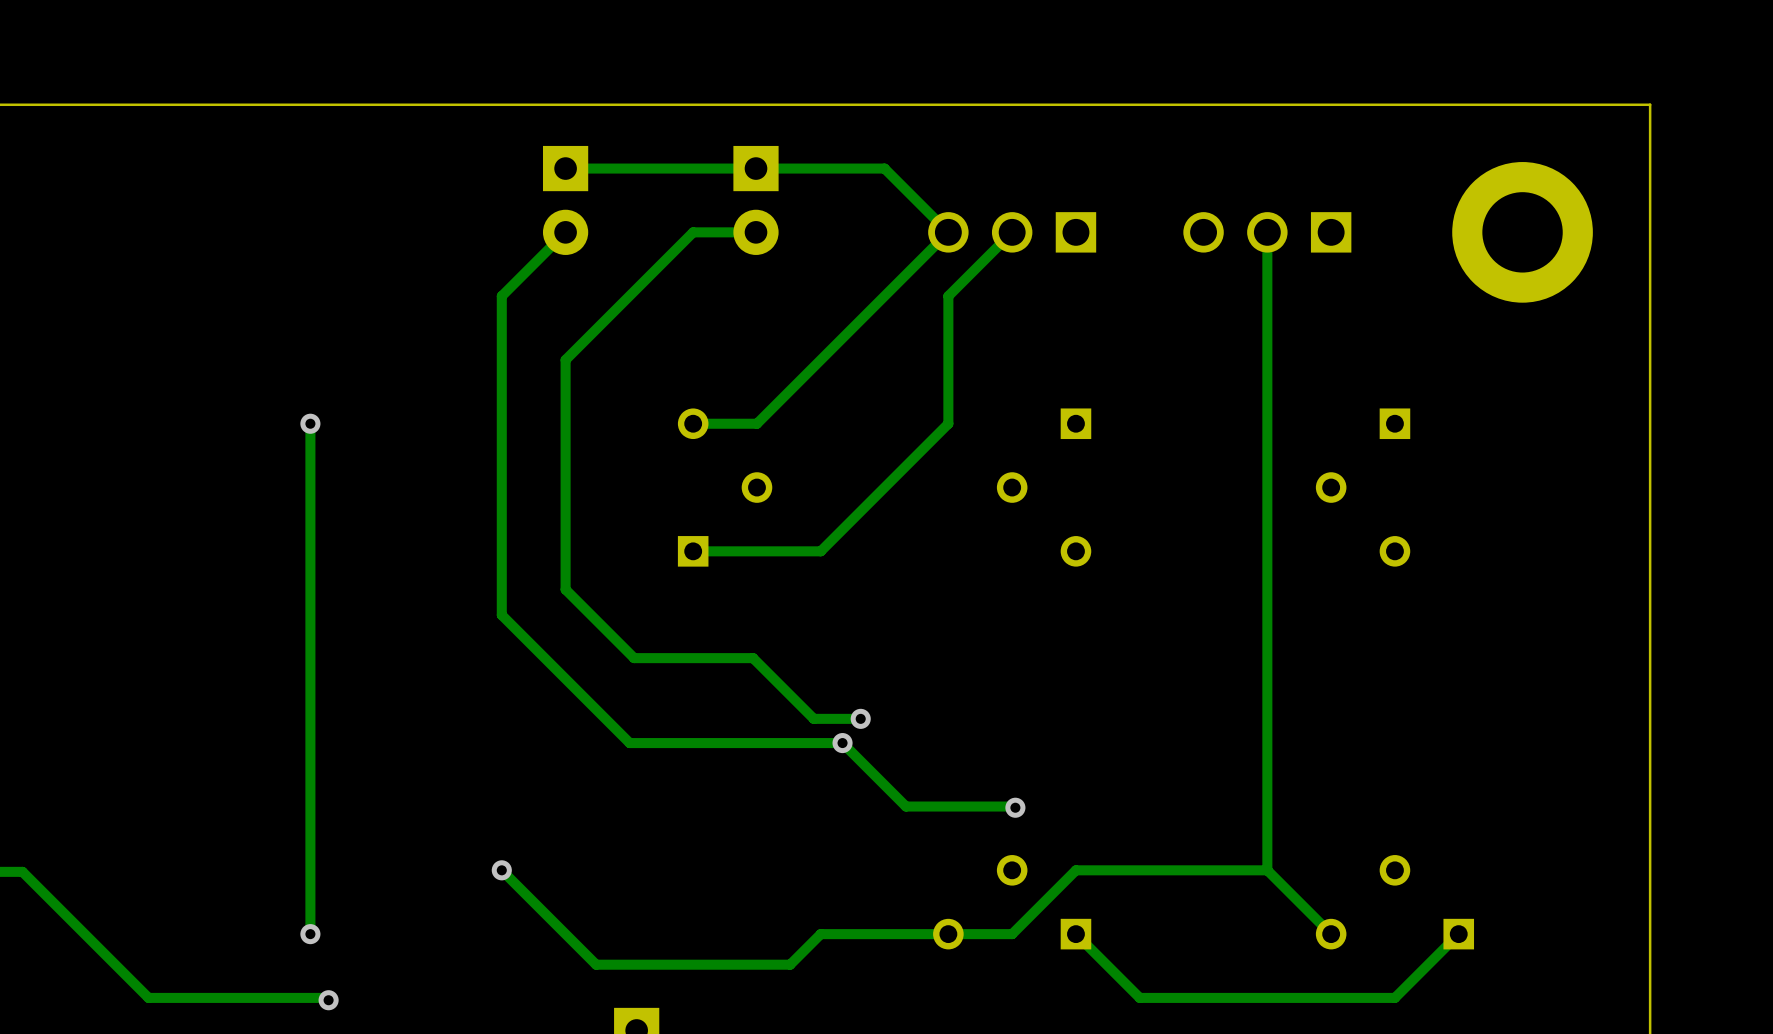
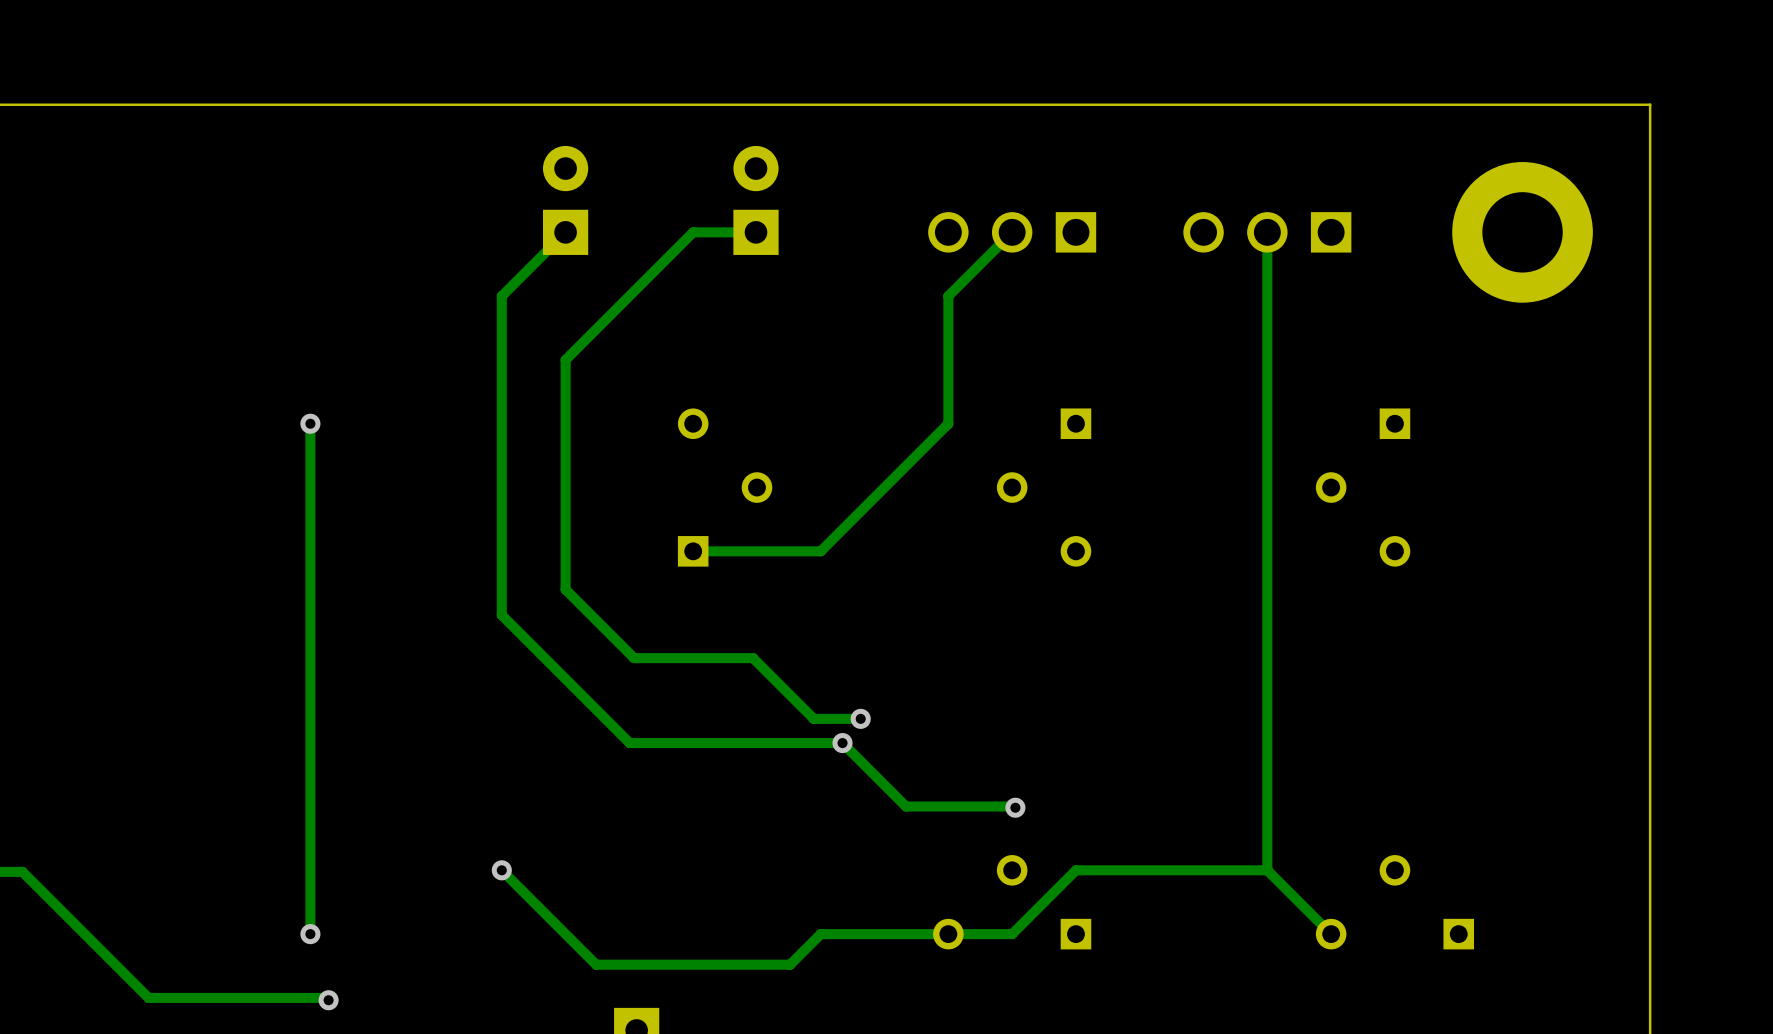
track: (565, 168) (884, 168) (948, 232) (756, 423) (693, 423) -> none
part rotation: 0° (565, 200) -> 180° (565, 200)
part rotation: 0° (755, 200) -> 180° (755, 200)
track: (1458, 934) (1394, 997) (1139, 997) (1075, 934) -> none

